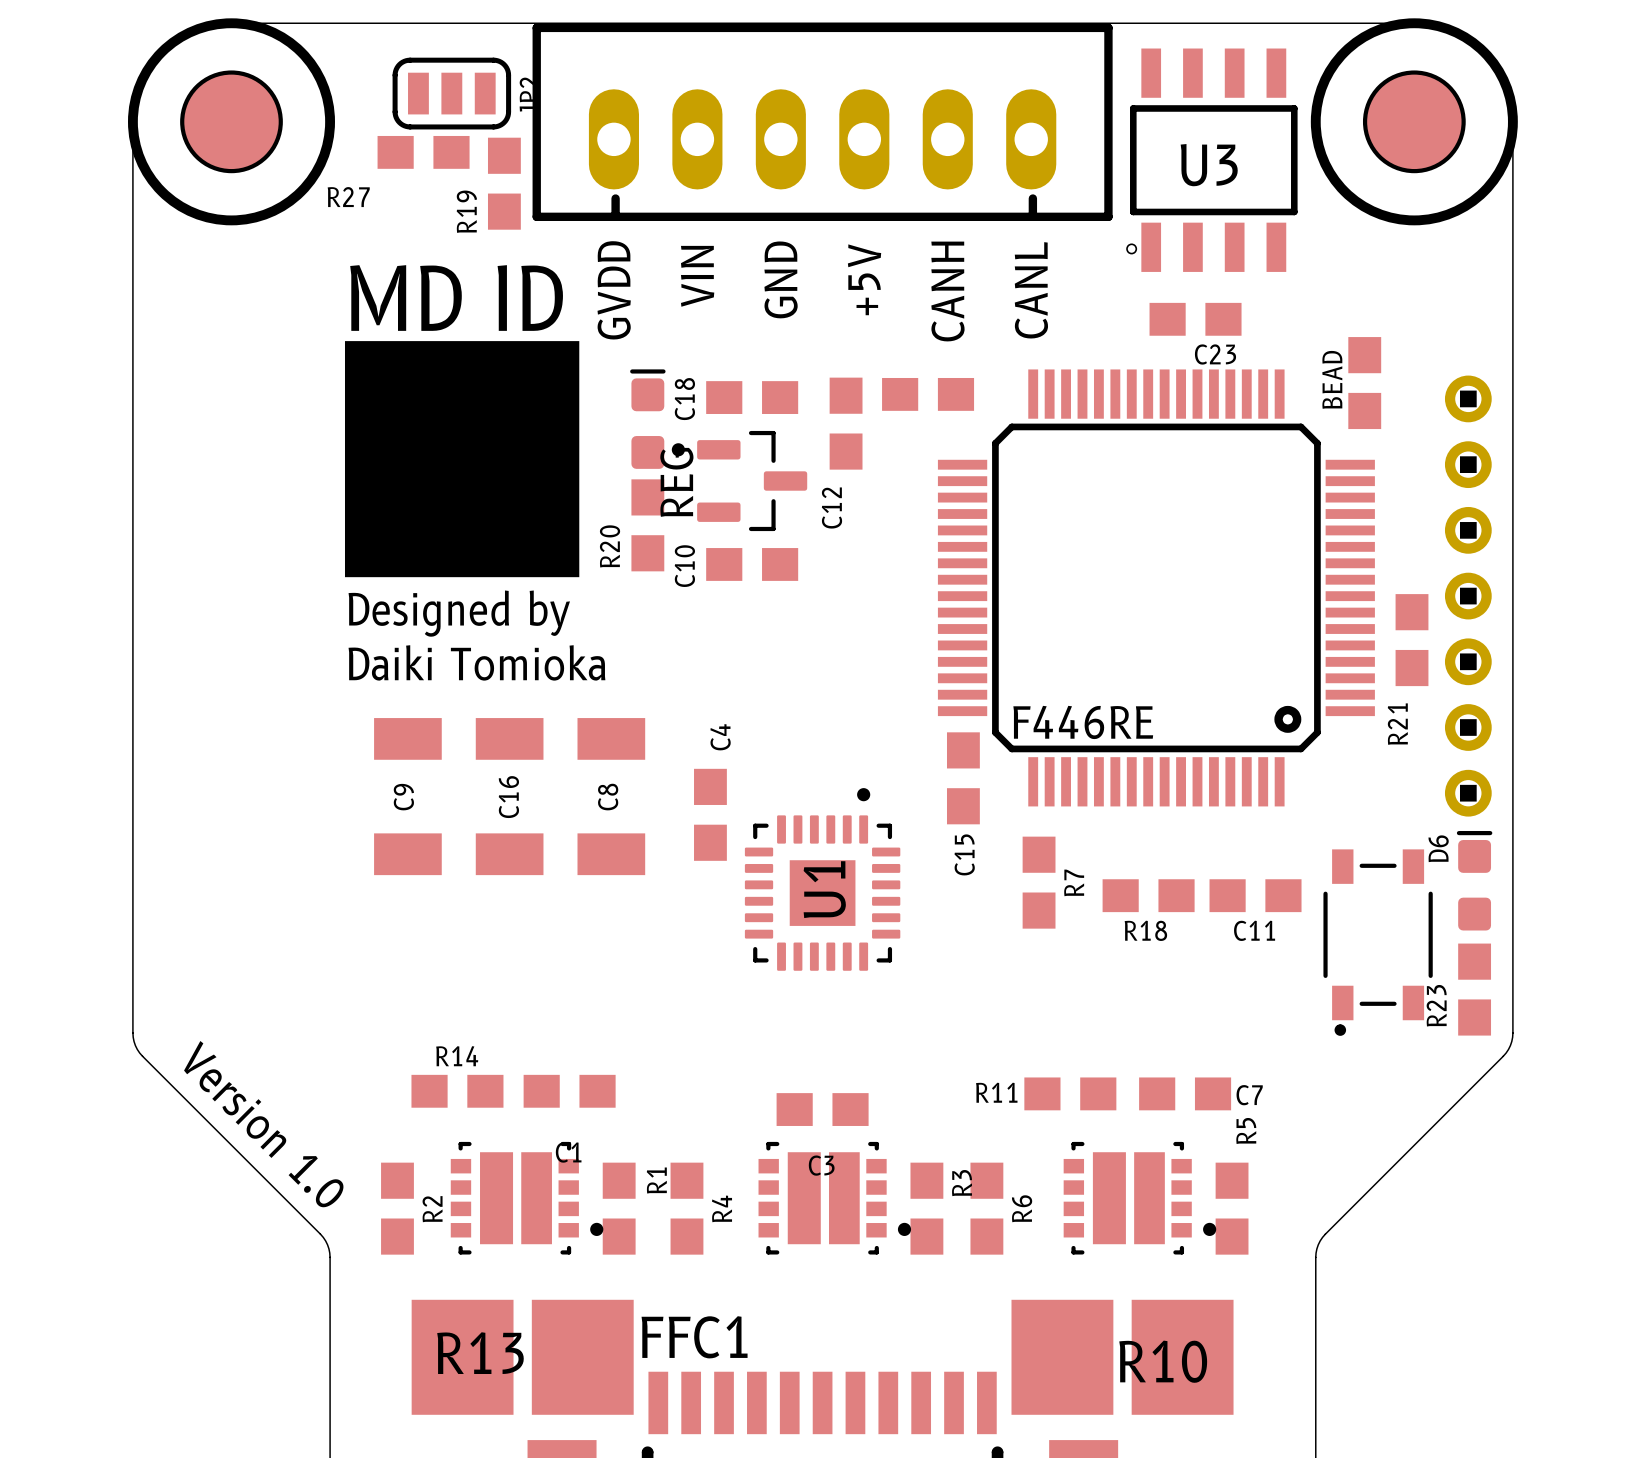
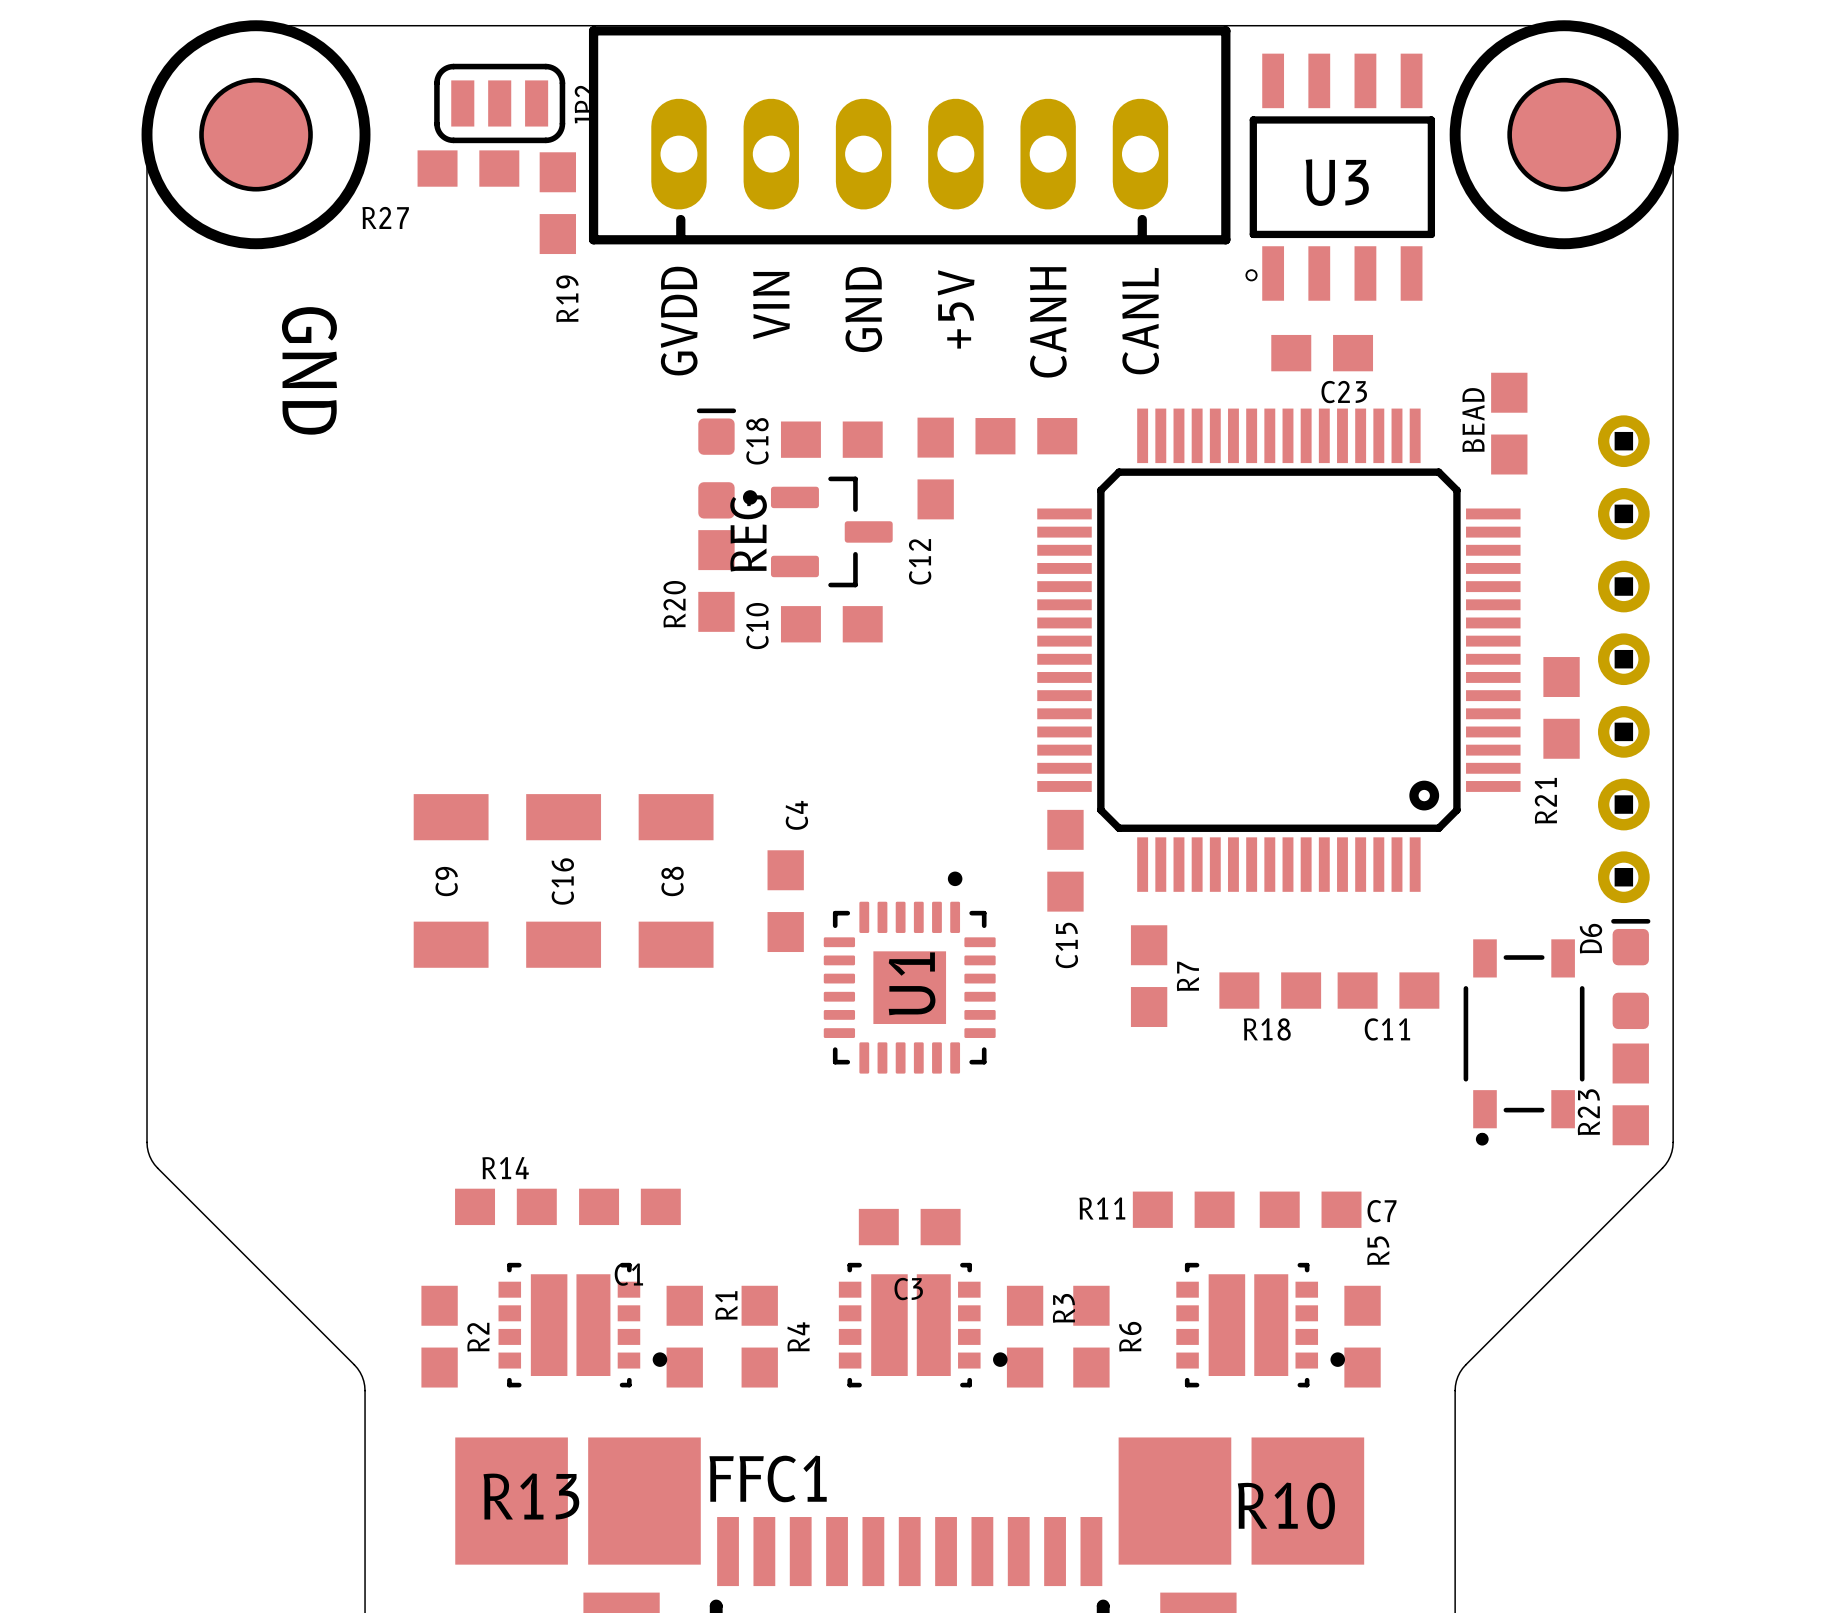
R19 name position: R19 (466, 211) -> R19 (567, 298)
text: MD ID (456, 298) -> none
text: none -> GND (309, 370)
drawing: [344, 341, 580, 578] -> none
text: Designed by (459, 613) -> none
text: Daiki Tomioka (476, 662) -> none
text: F446RE (1083, 722) -> none
text: Version 1.0 (263, 1124) -> none

